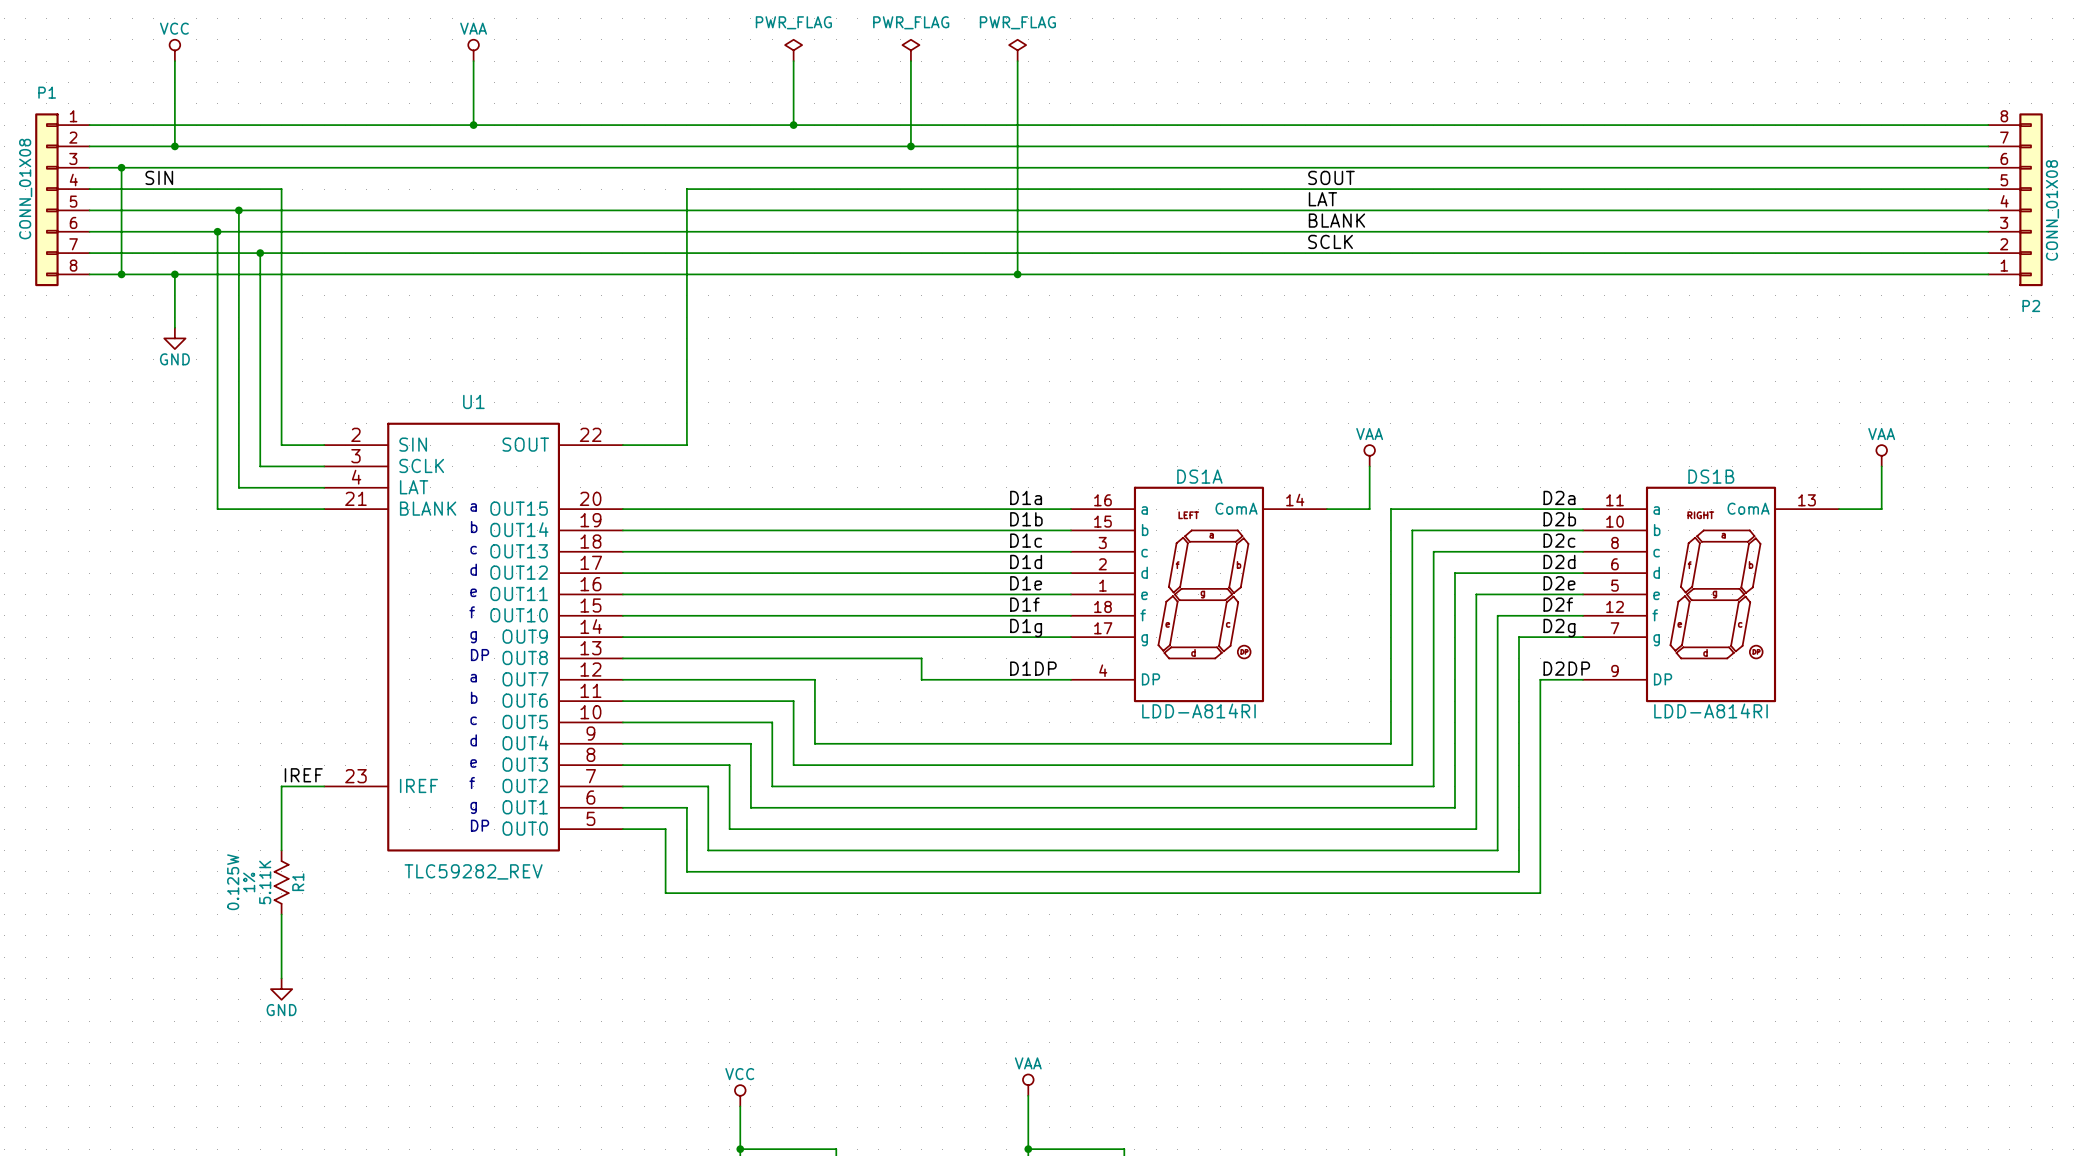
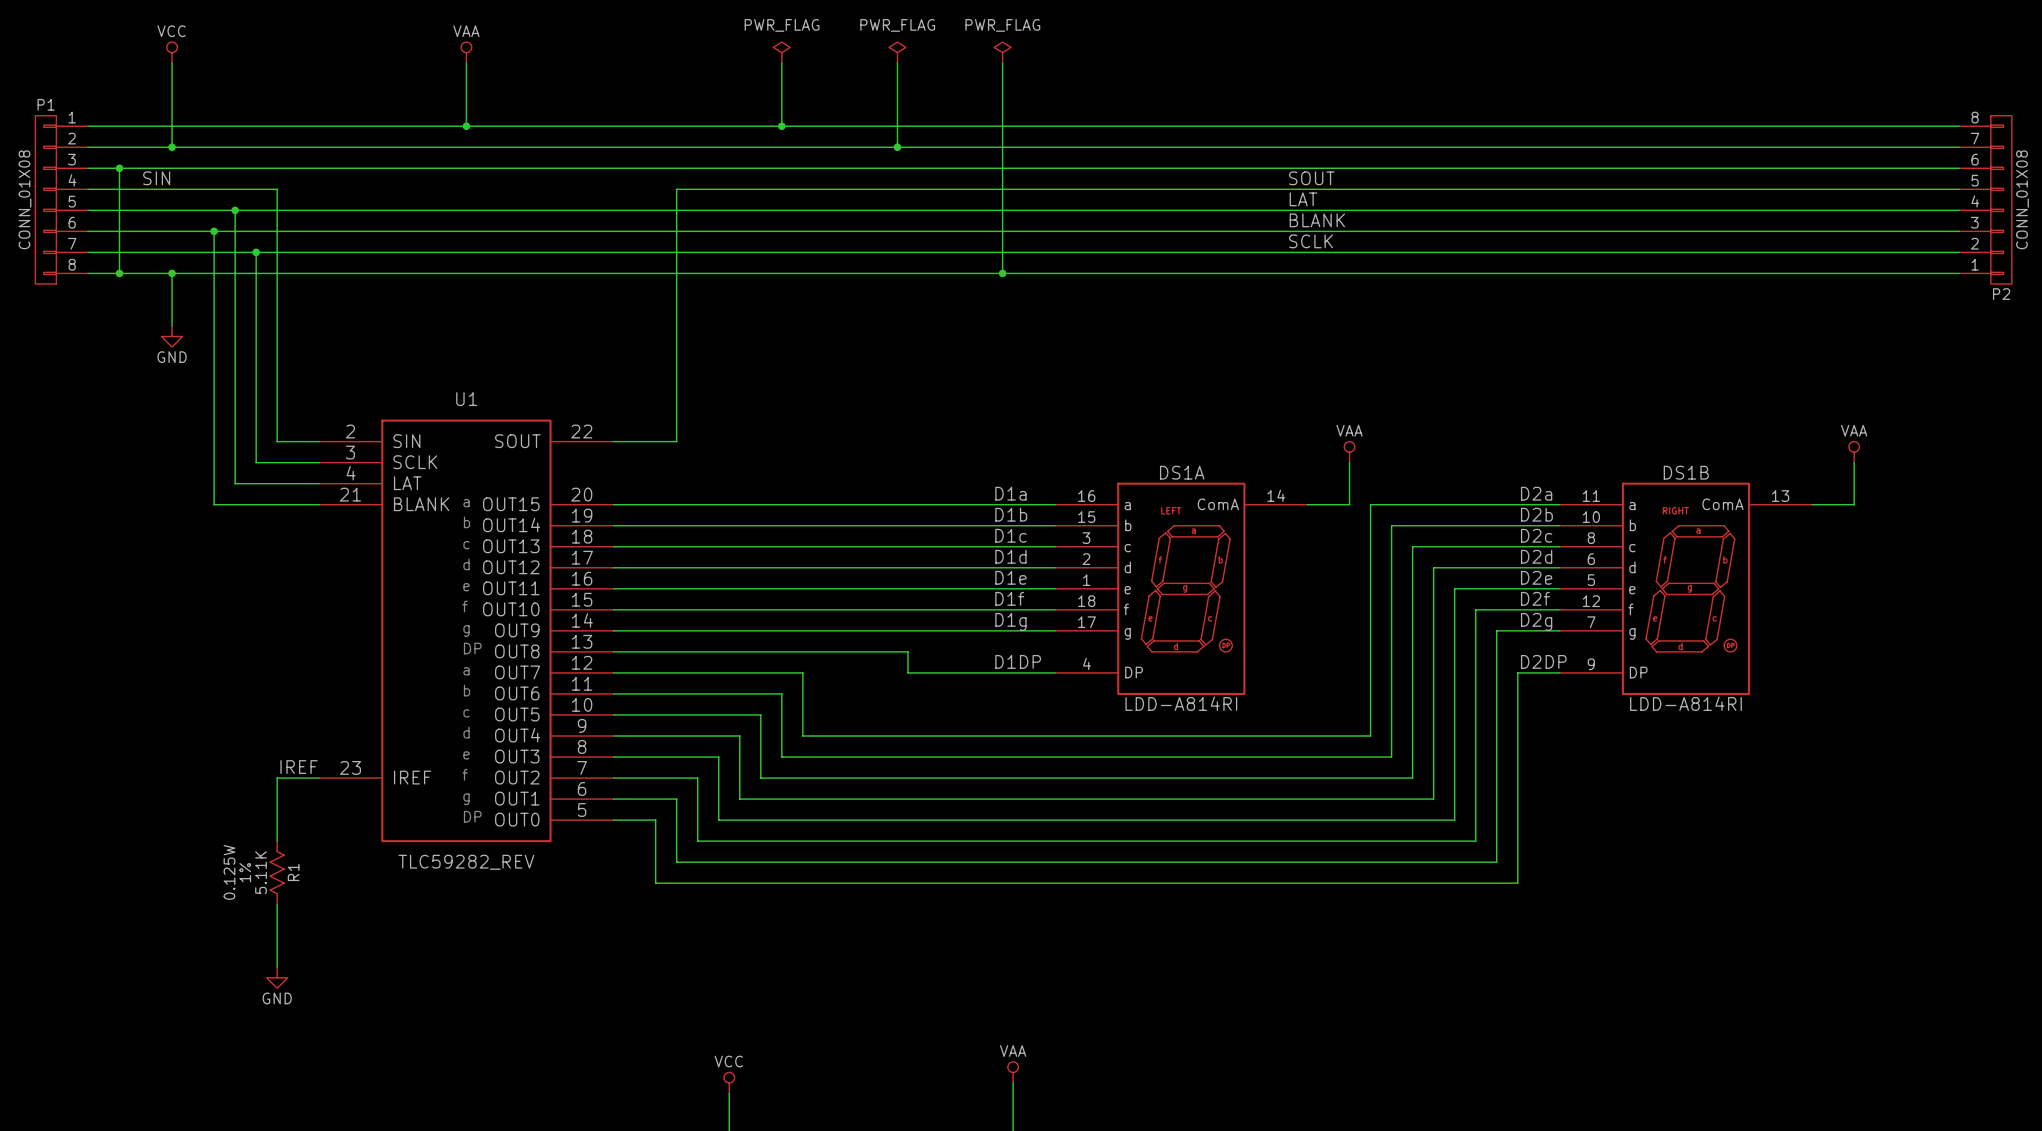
P1 symbol: [35, 113, 90, 287] -> [35, 115, 88, 284]
P2 symbol: [1988, 113, 2043, 287] -> [1959, 115, 2012, 284]

